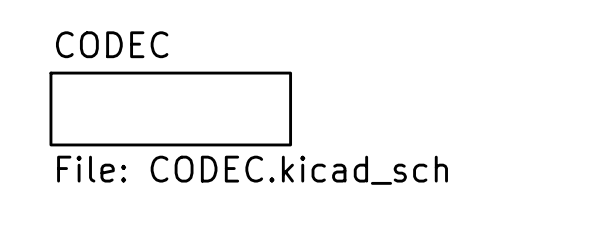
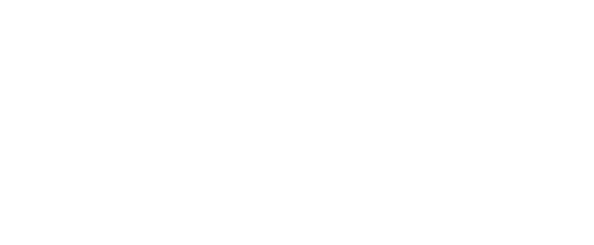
sheet CODEC: File: CODEC.kicad_sch (170, 109) -> none

